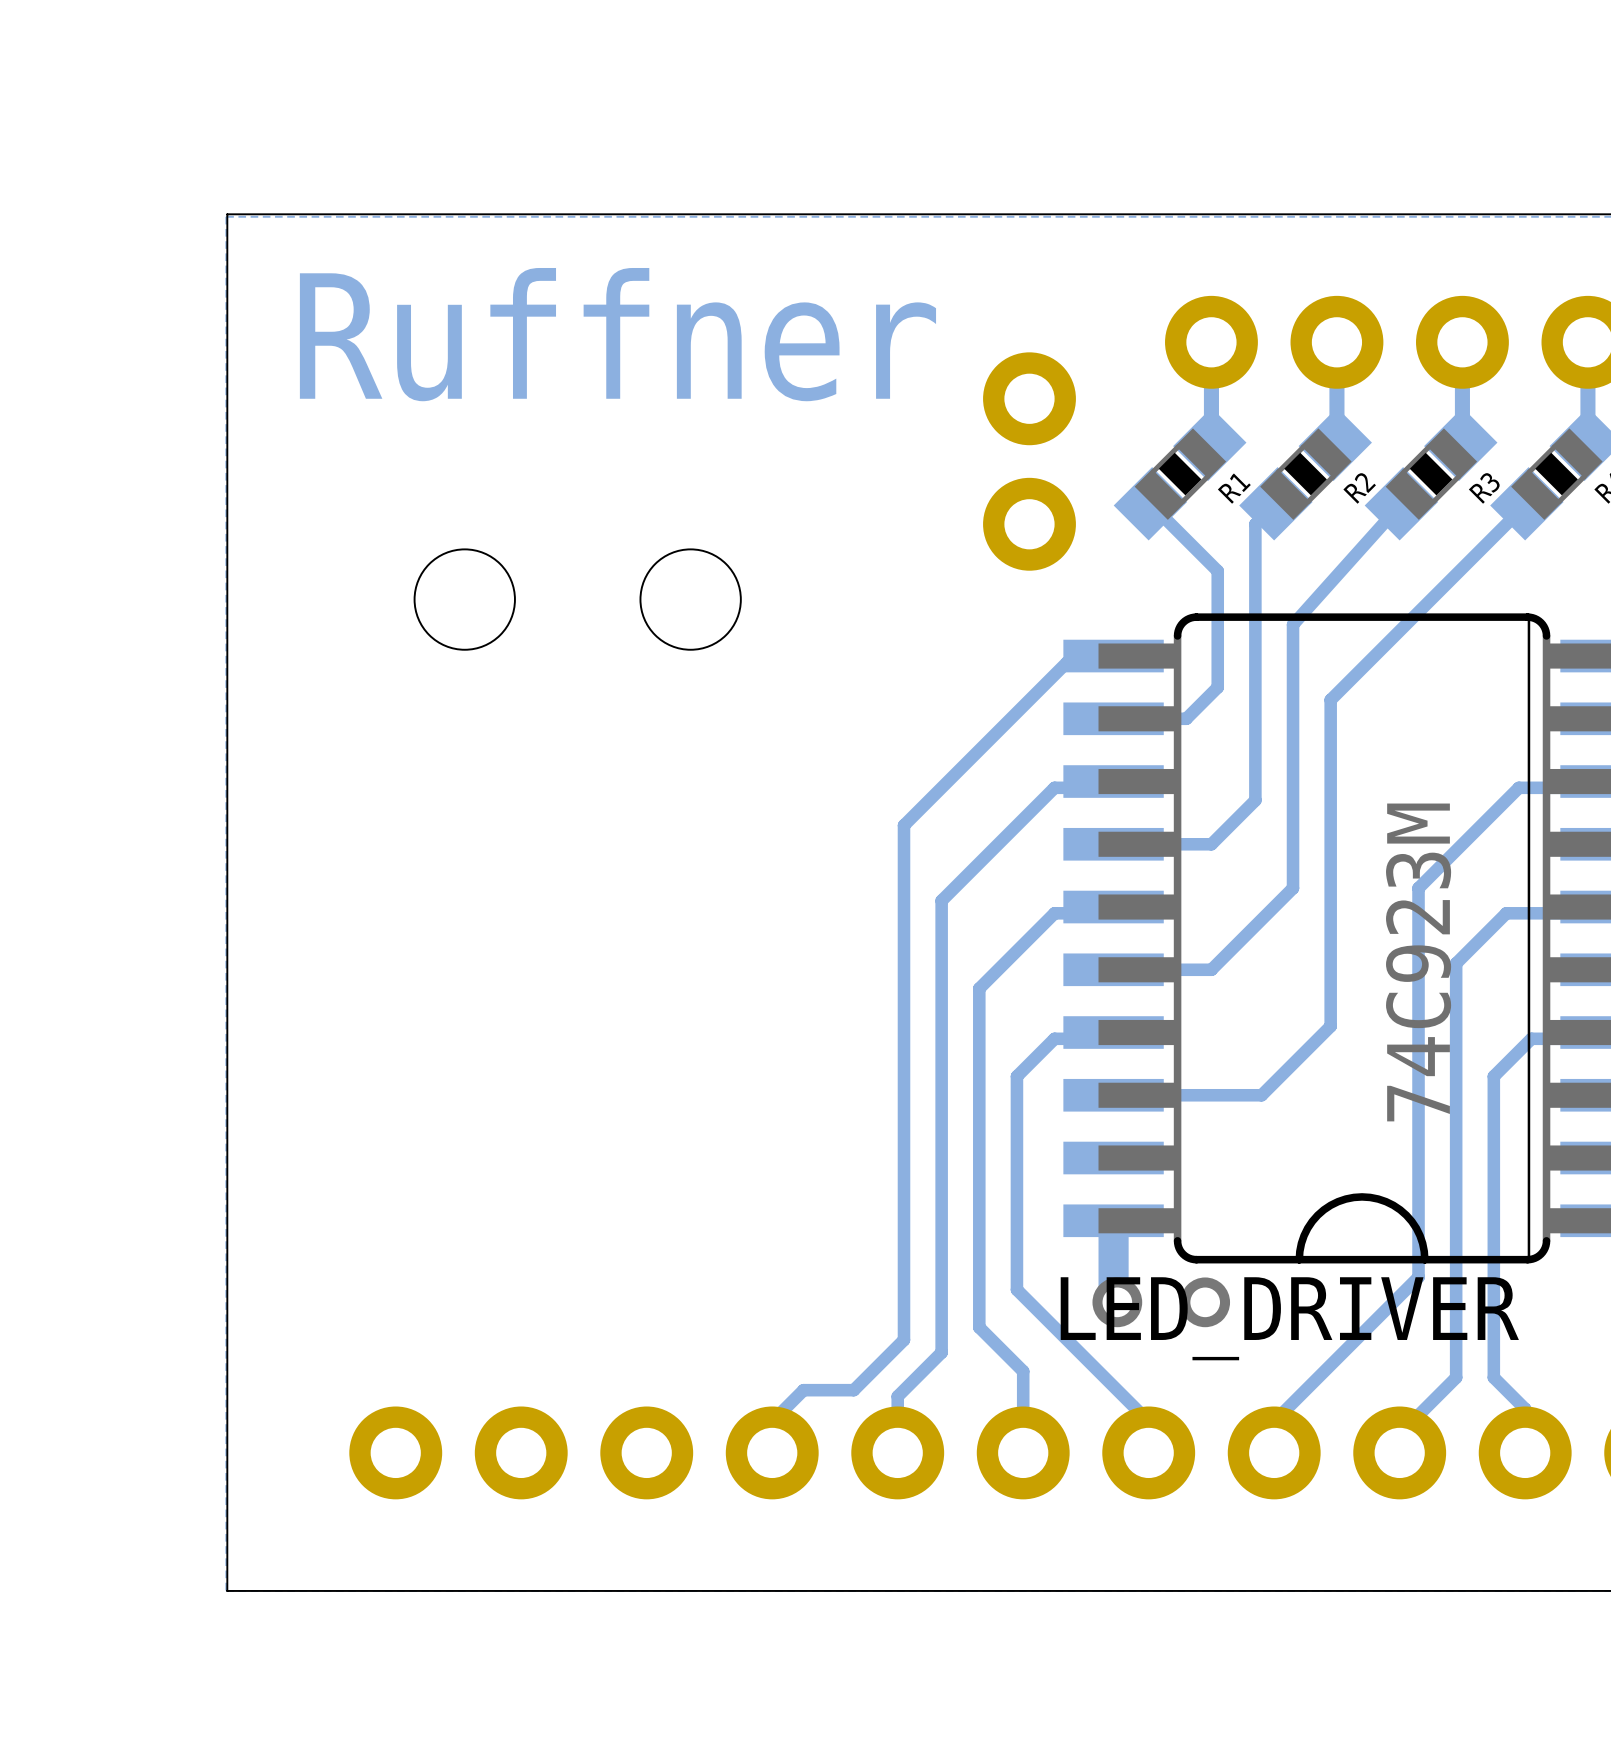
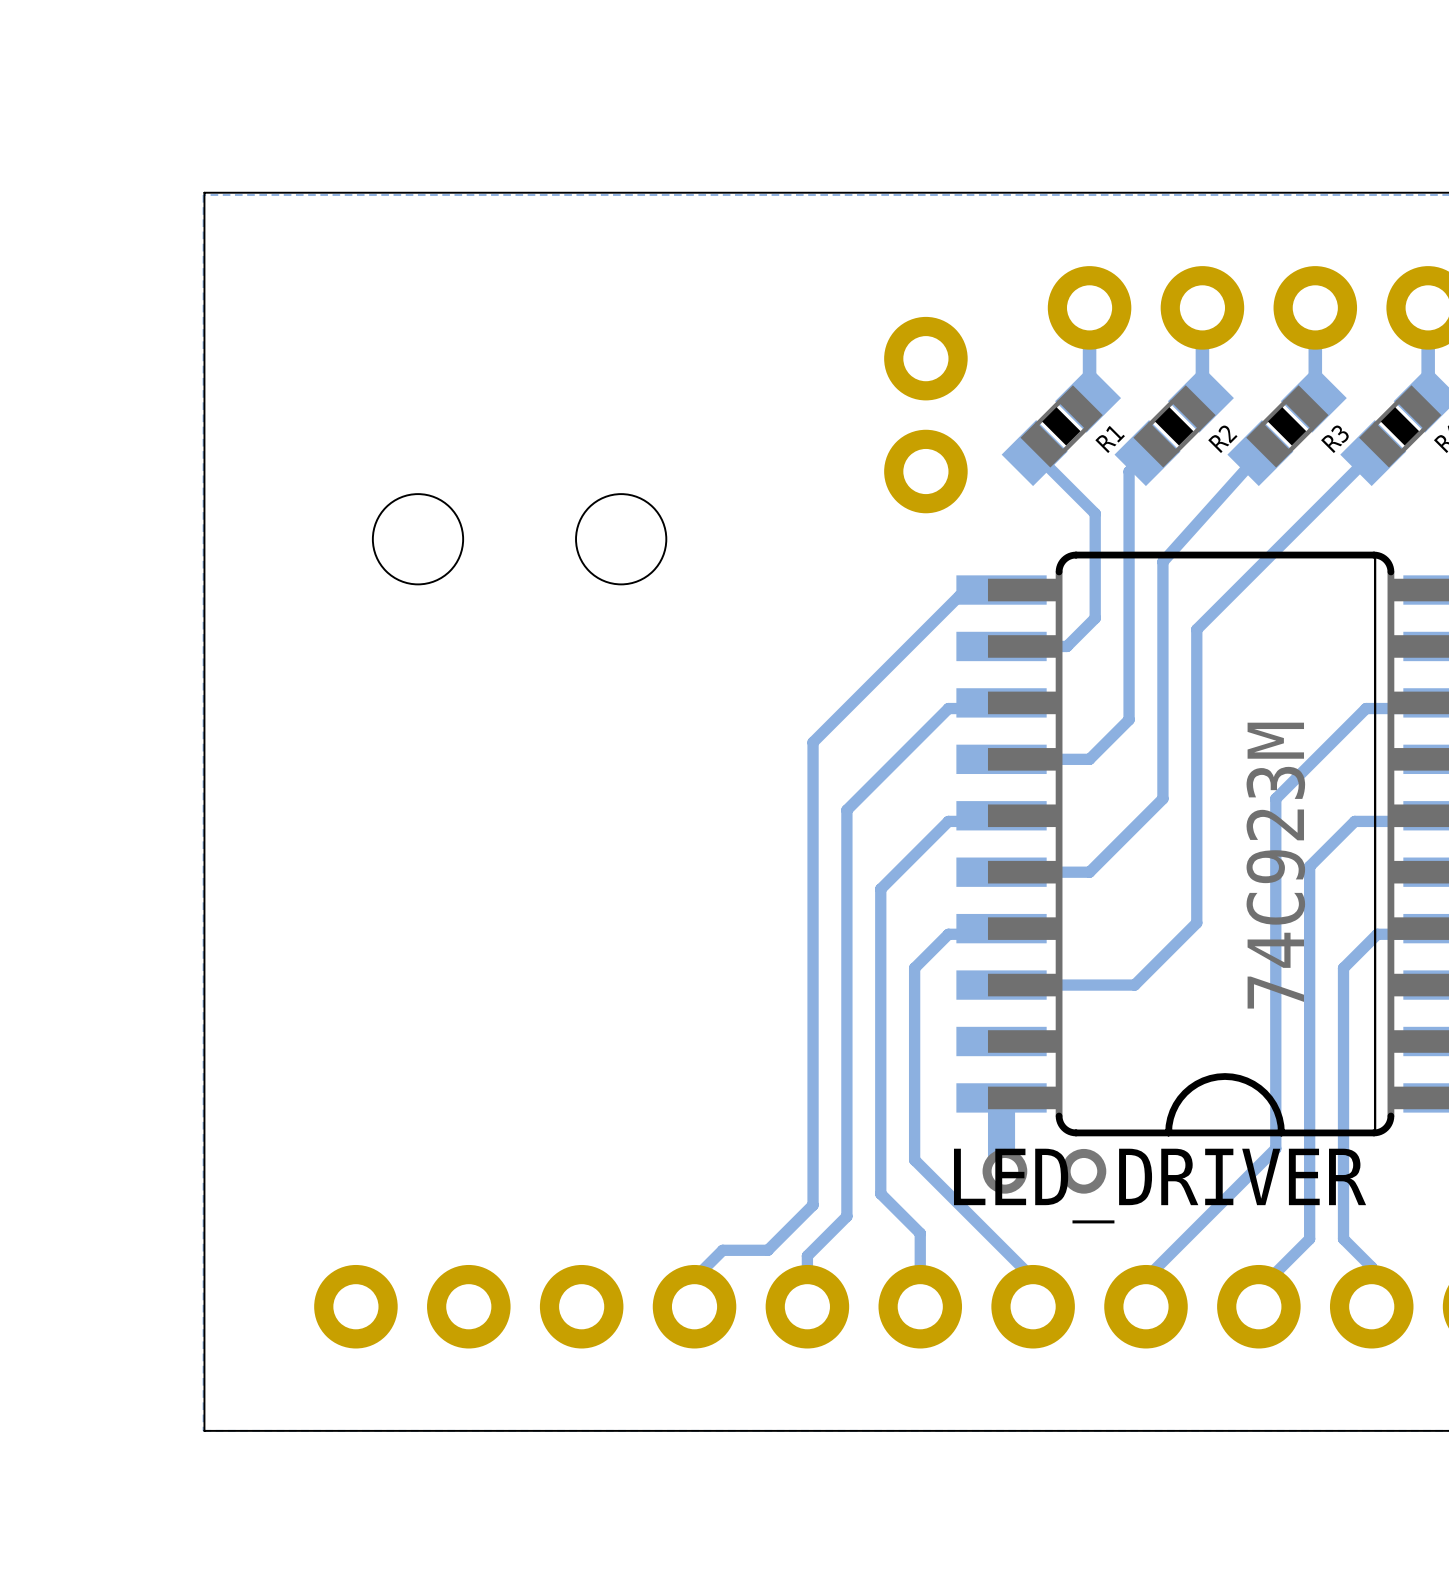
text: Ruffner (617, 334) -> none

